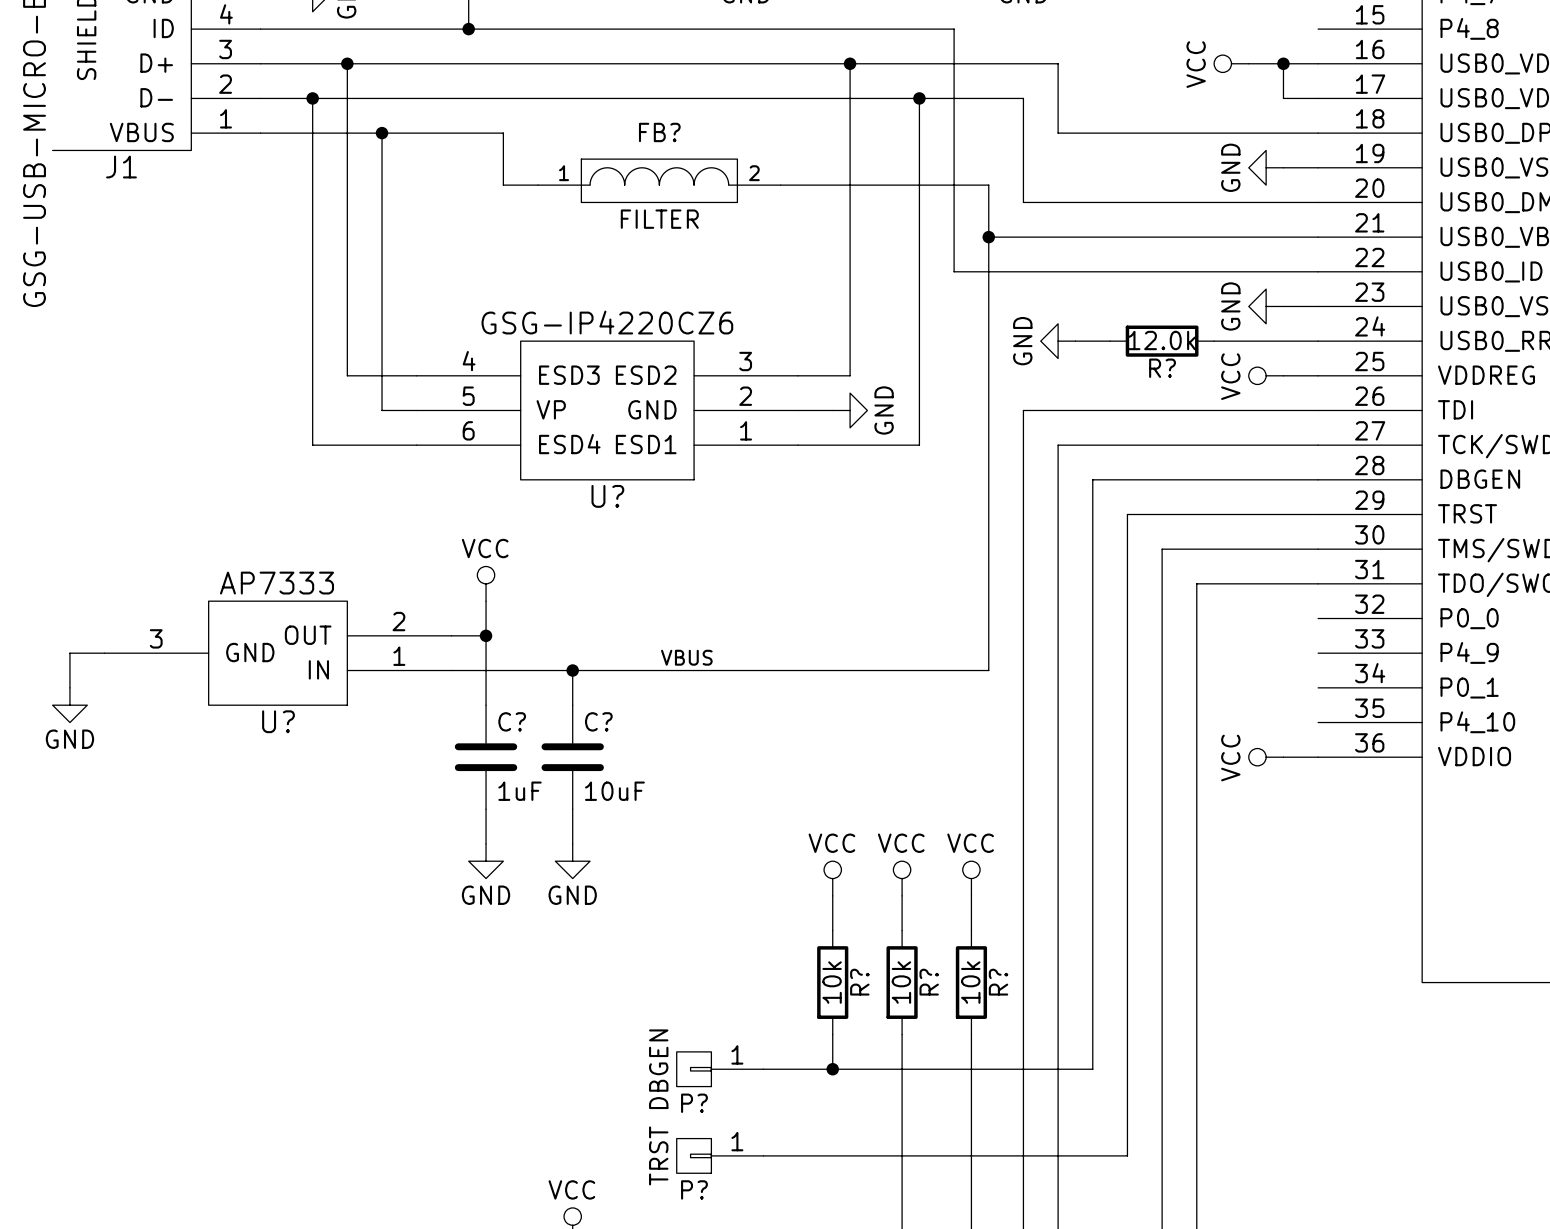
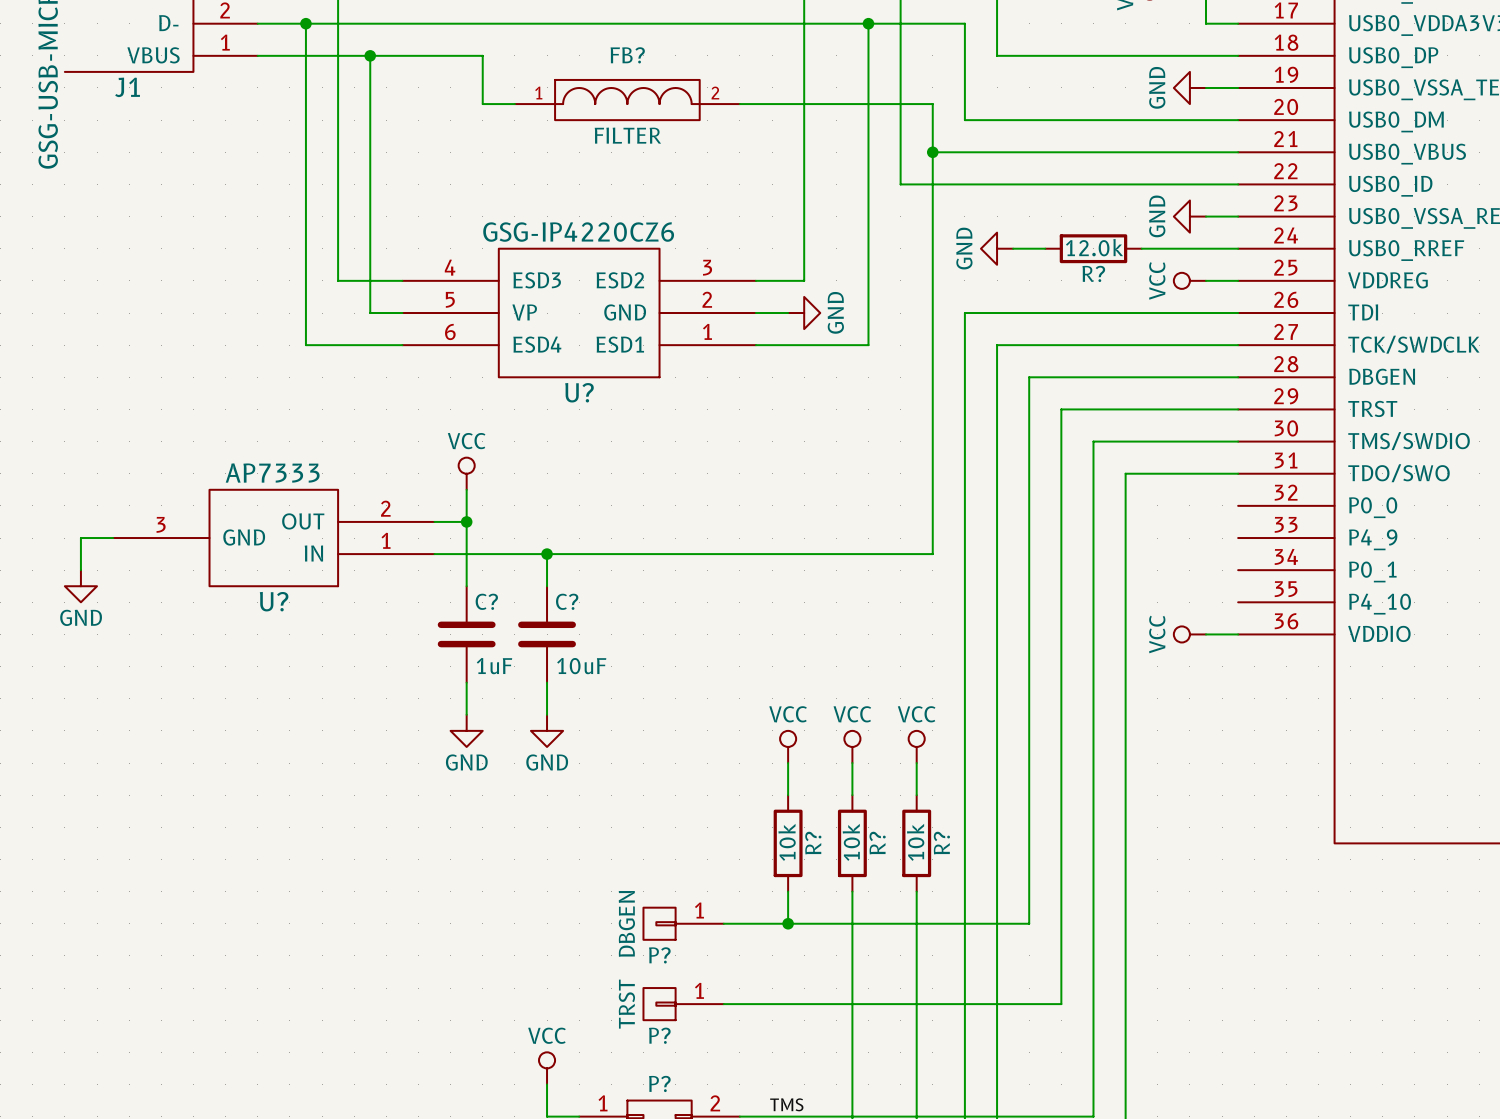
label: VBUS (686, 657) -> none

